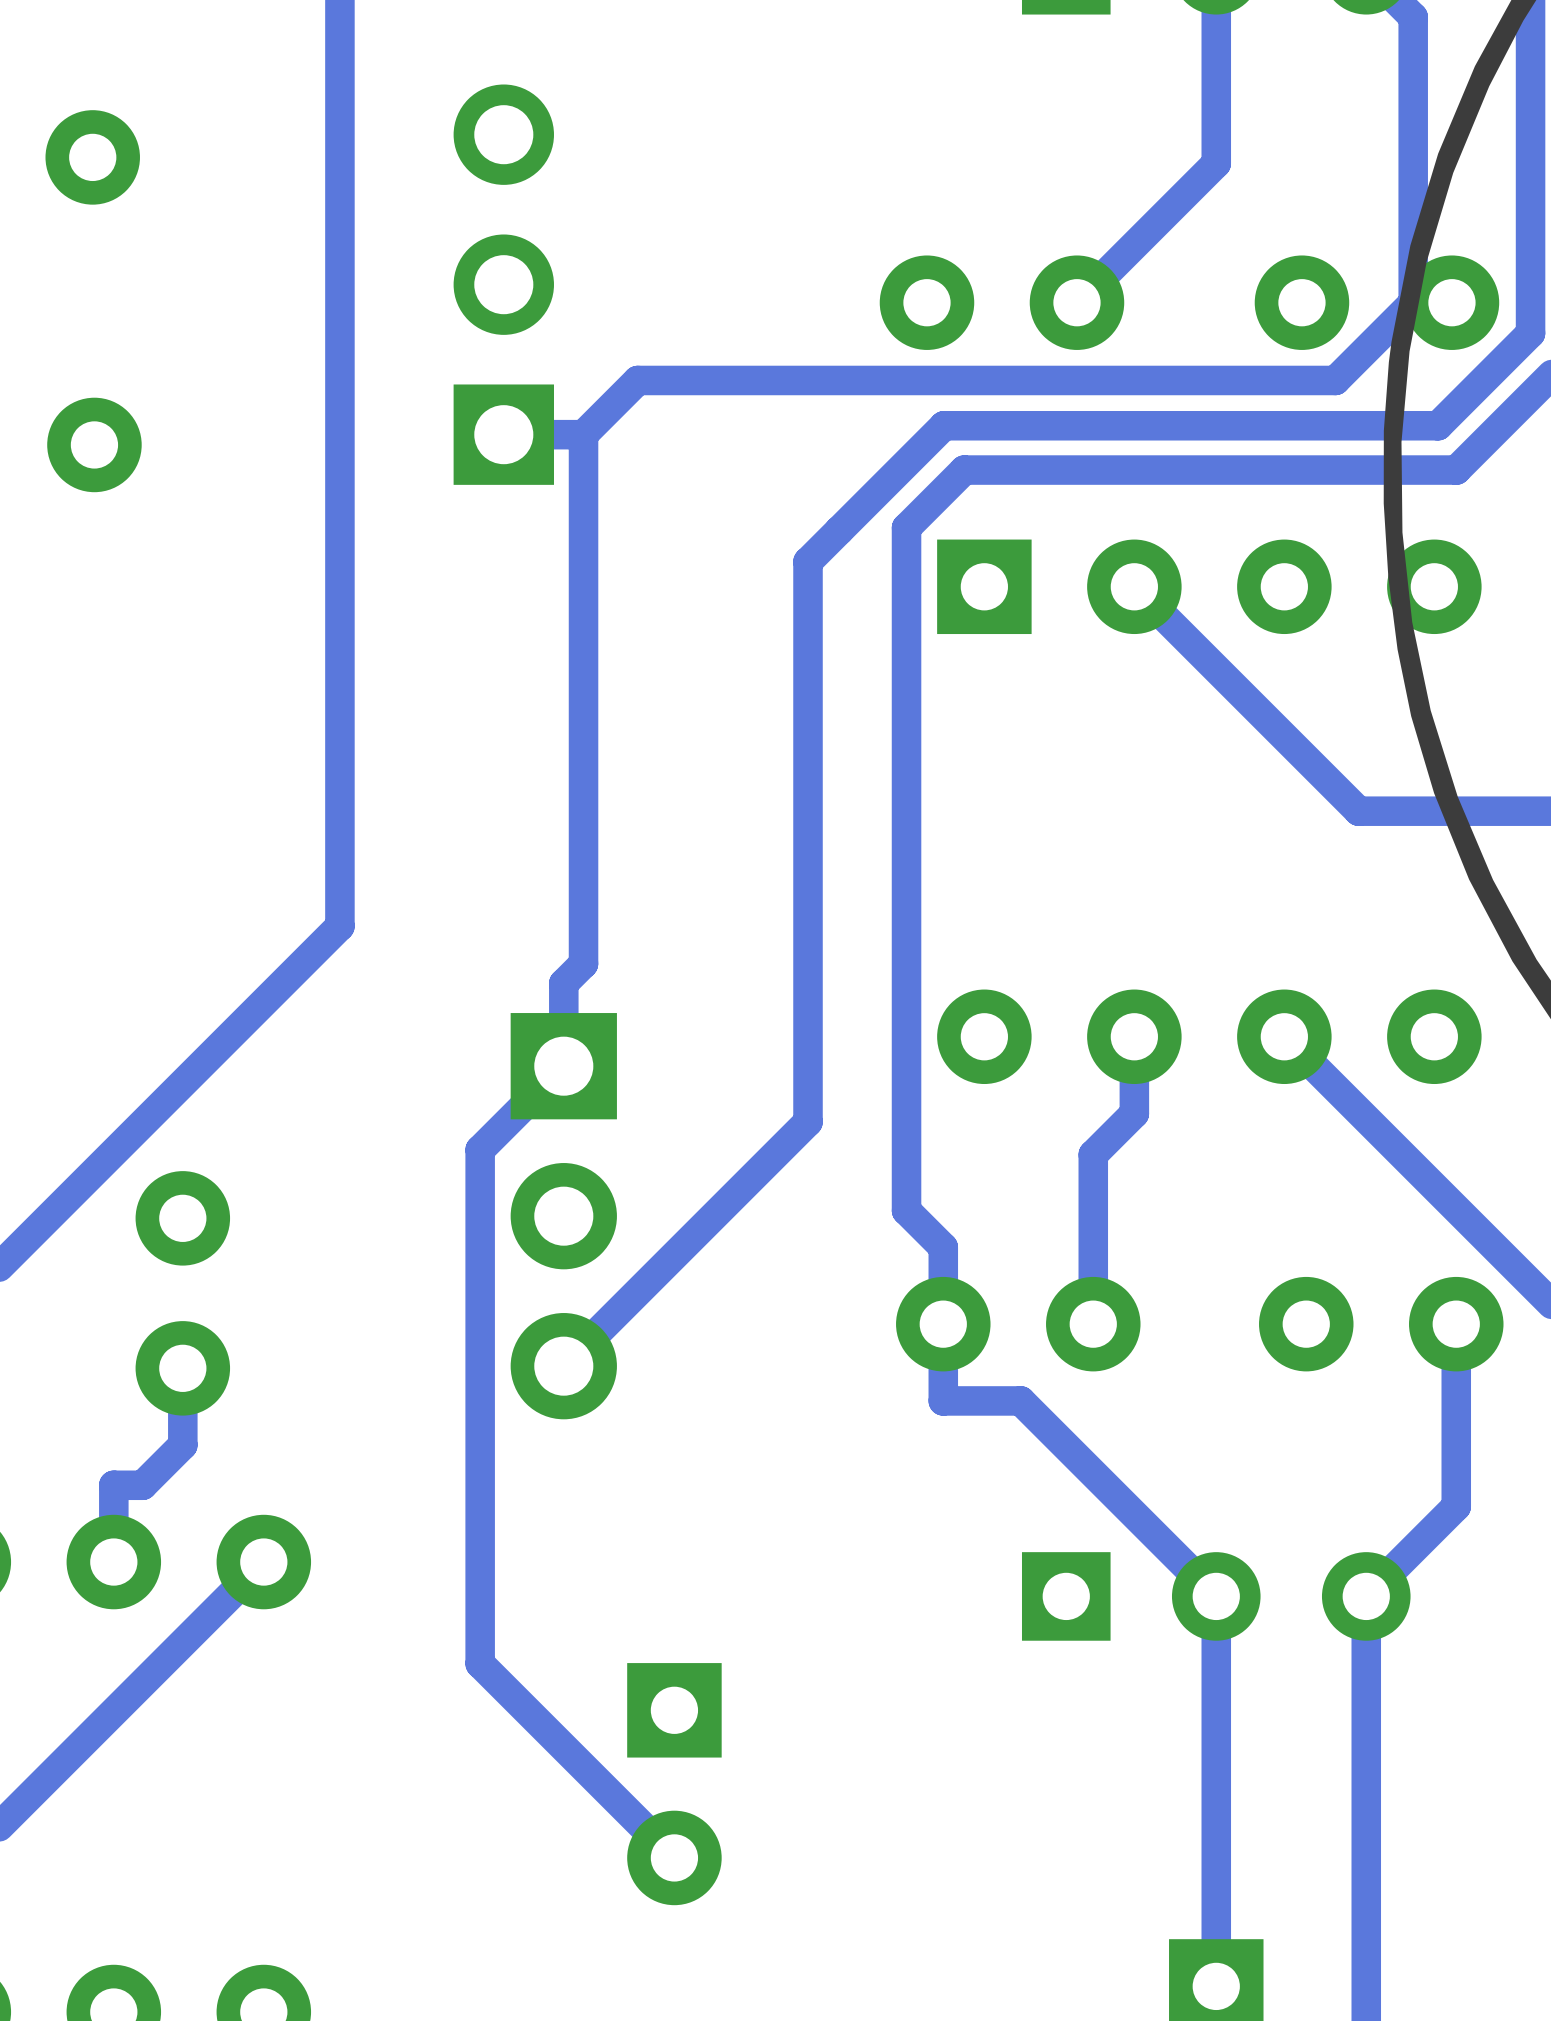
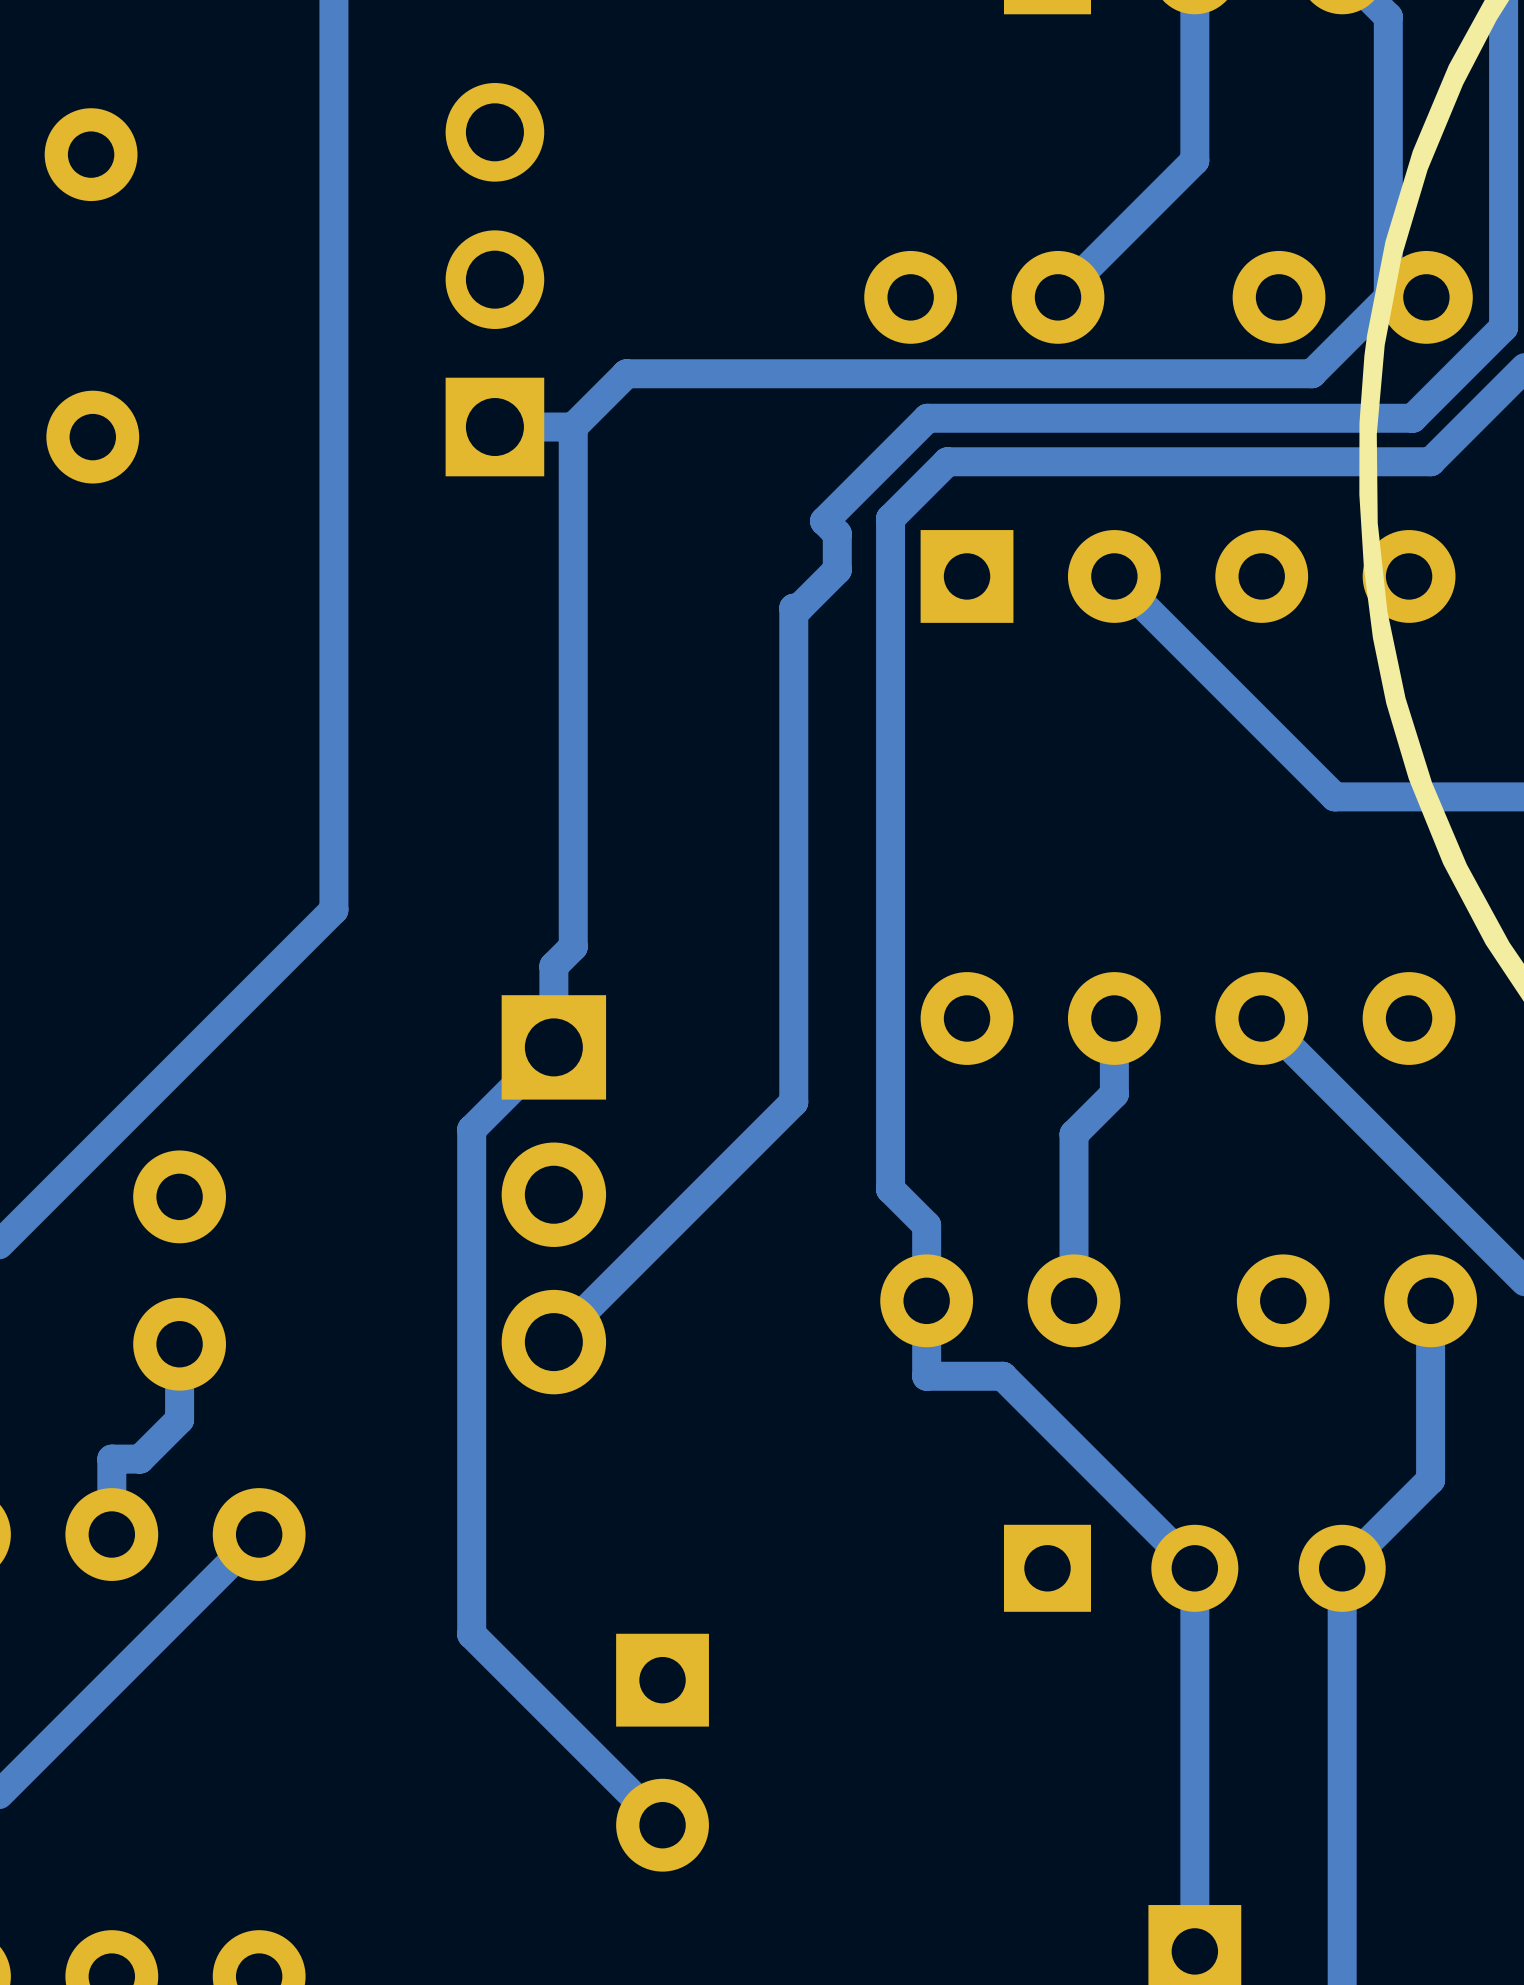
track: (839, 530) (808, 561) (808, 619) -> (824, 521) (837, 533) (837, 569) (799, 608) (793, 608)

